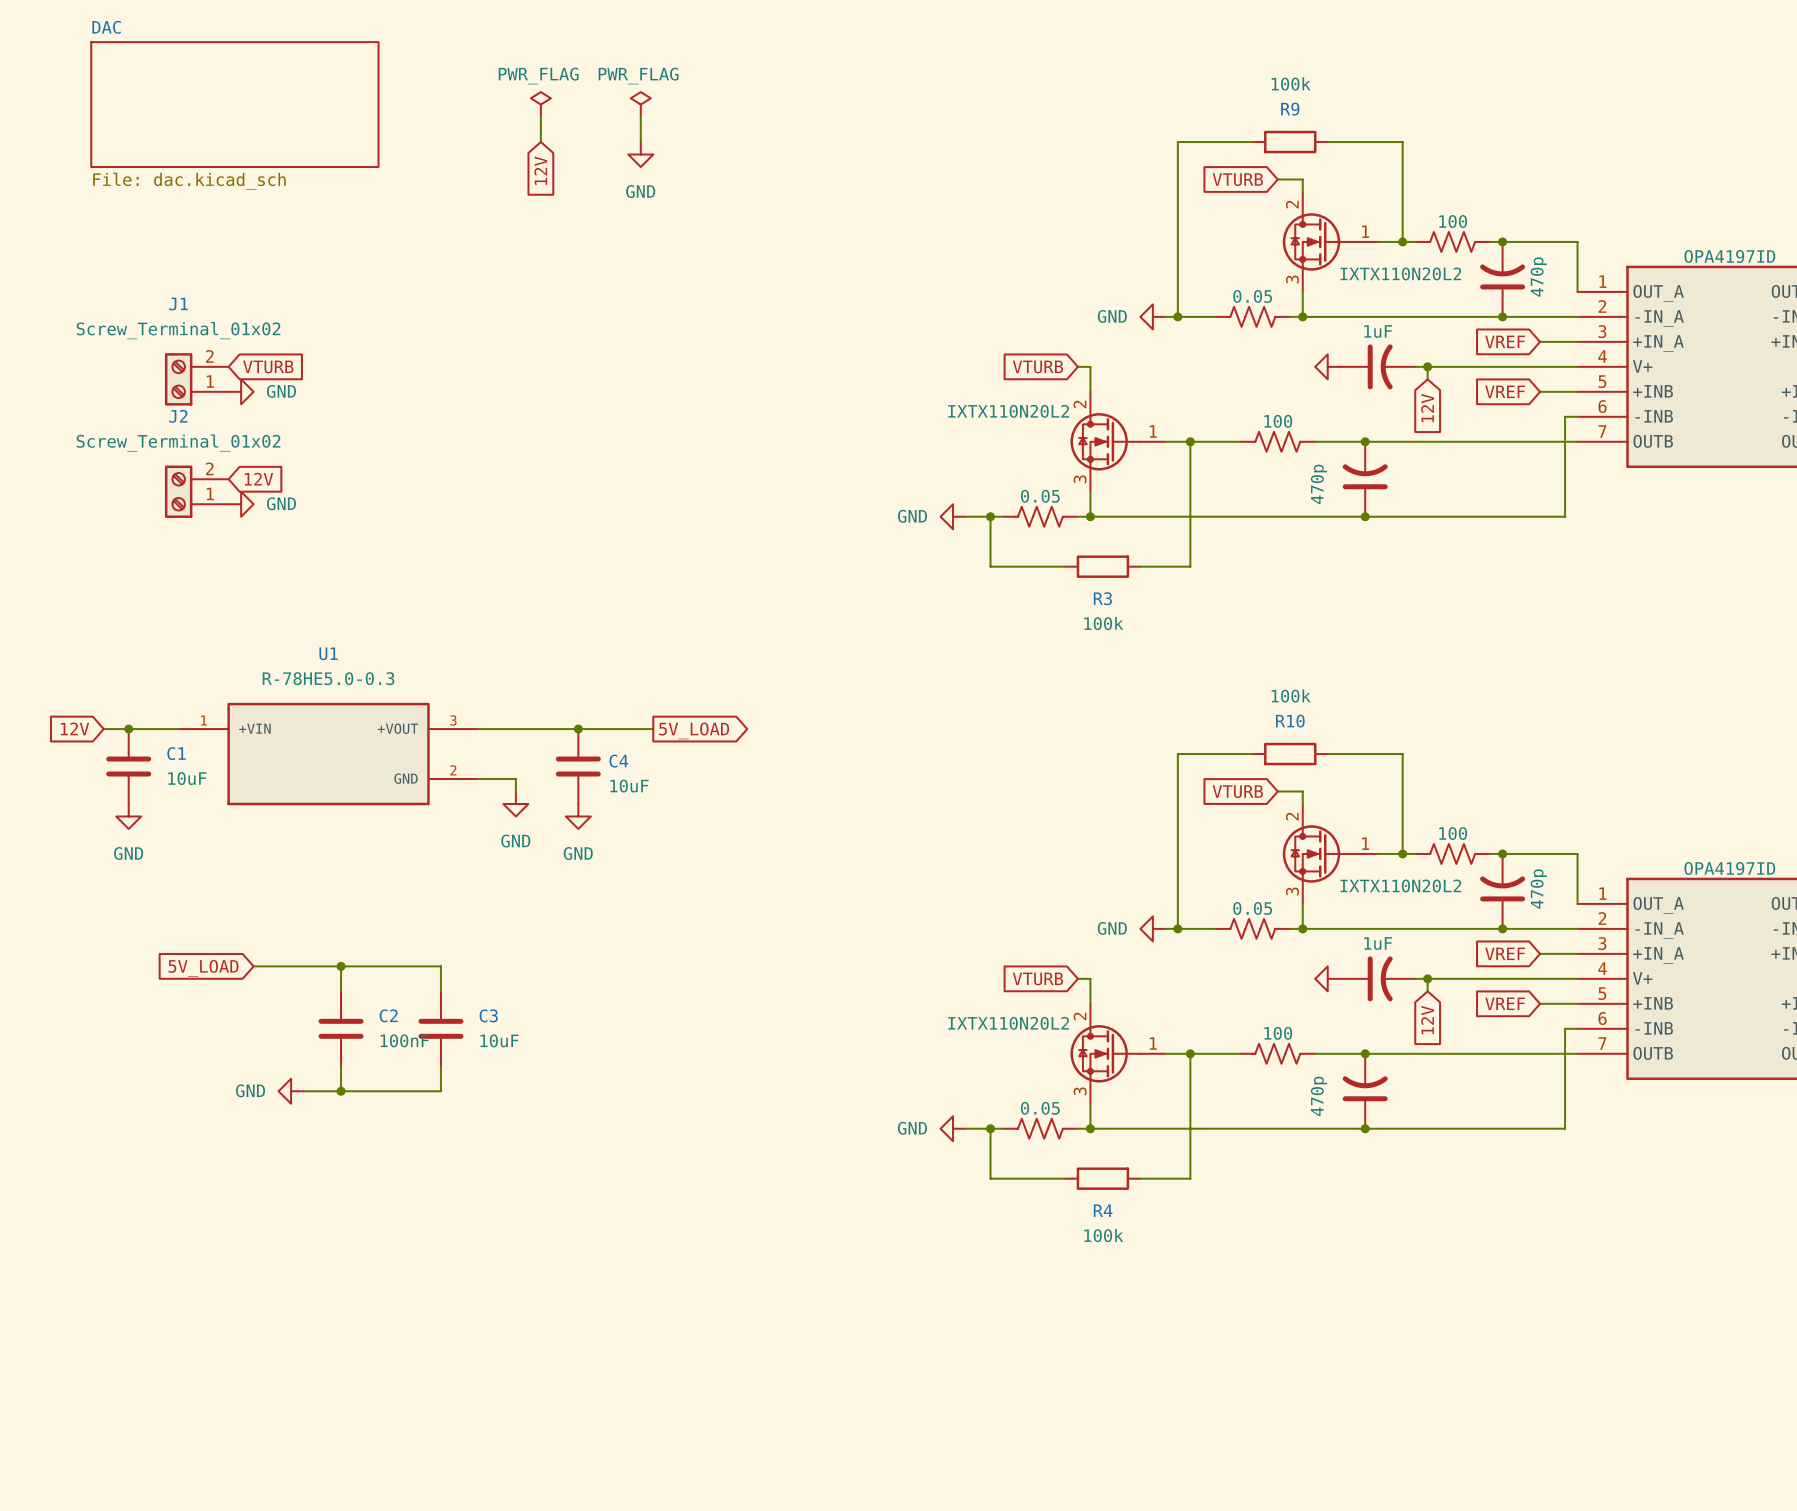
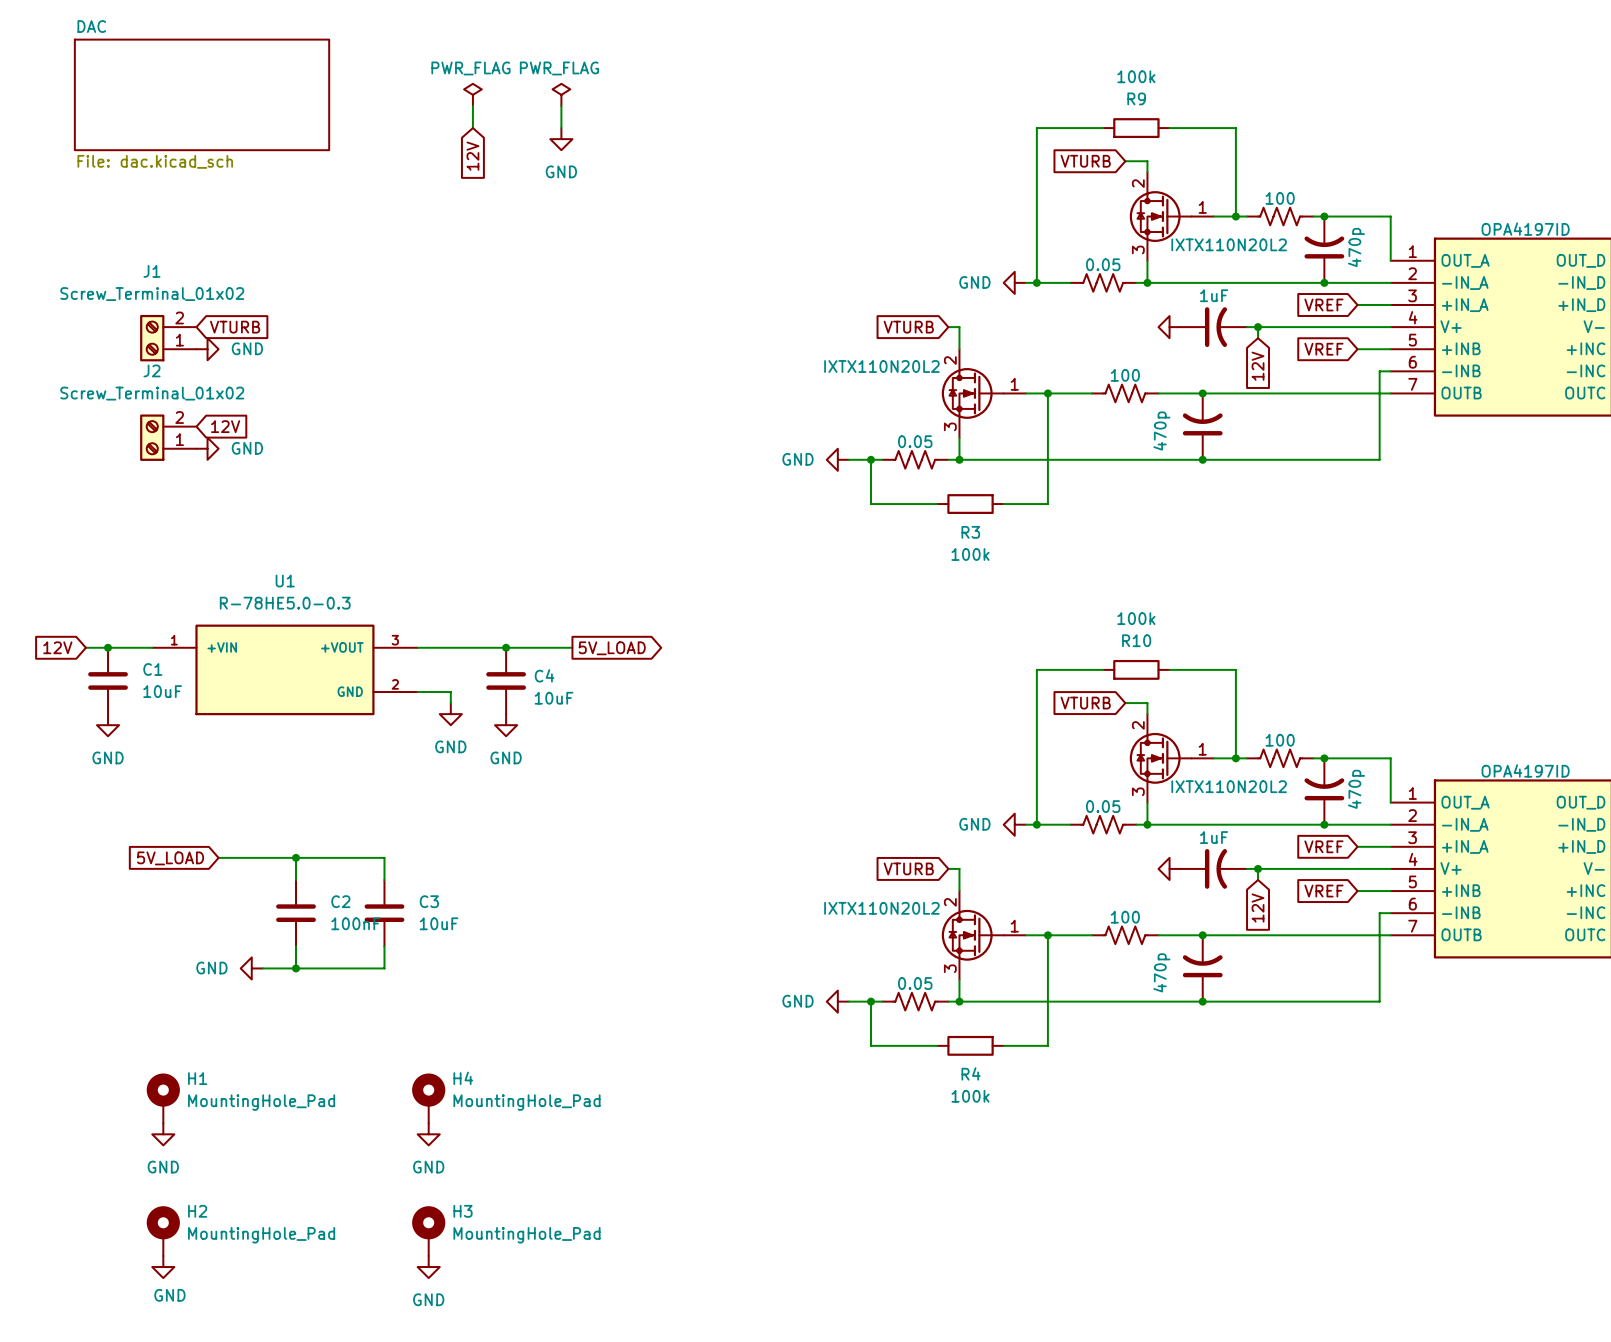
H1: none -> MountingHole_Pad (163, 1098)
H4: none -> MountingHole_Pad (428, 1098)
power symbol: none -> GND (163, 1134)
power symbol: none -> GND (428, 1134)
H2: none -> MountingHole_Pad (163, 1231)
H3: none -> MountingHole_Pad (428, 1231)
power symbol: none -> GND (163, 1267)
power symbol: none -> GND (428, 1267)

